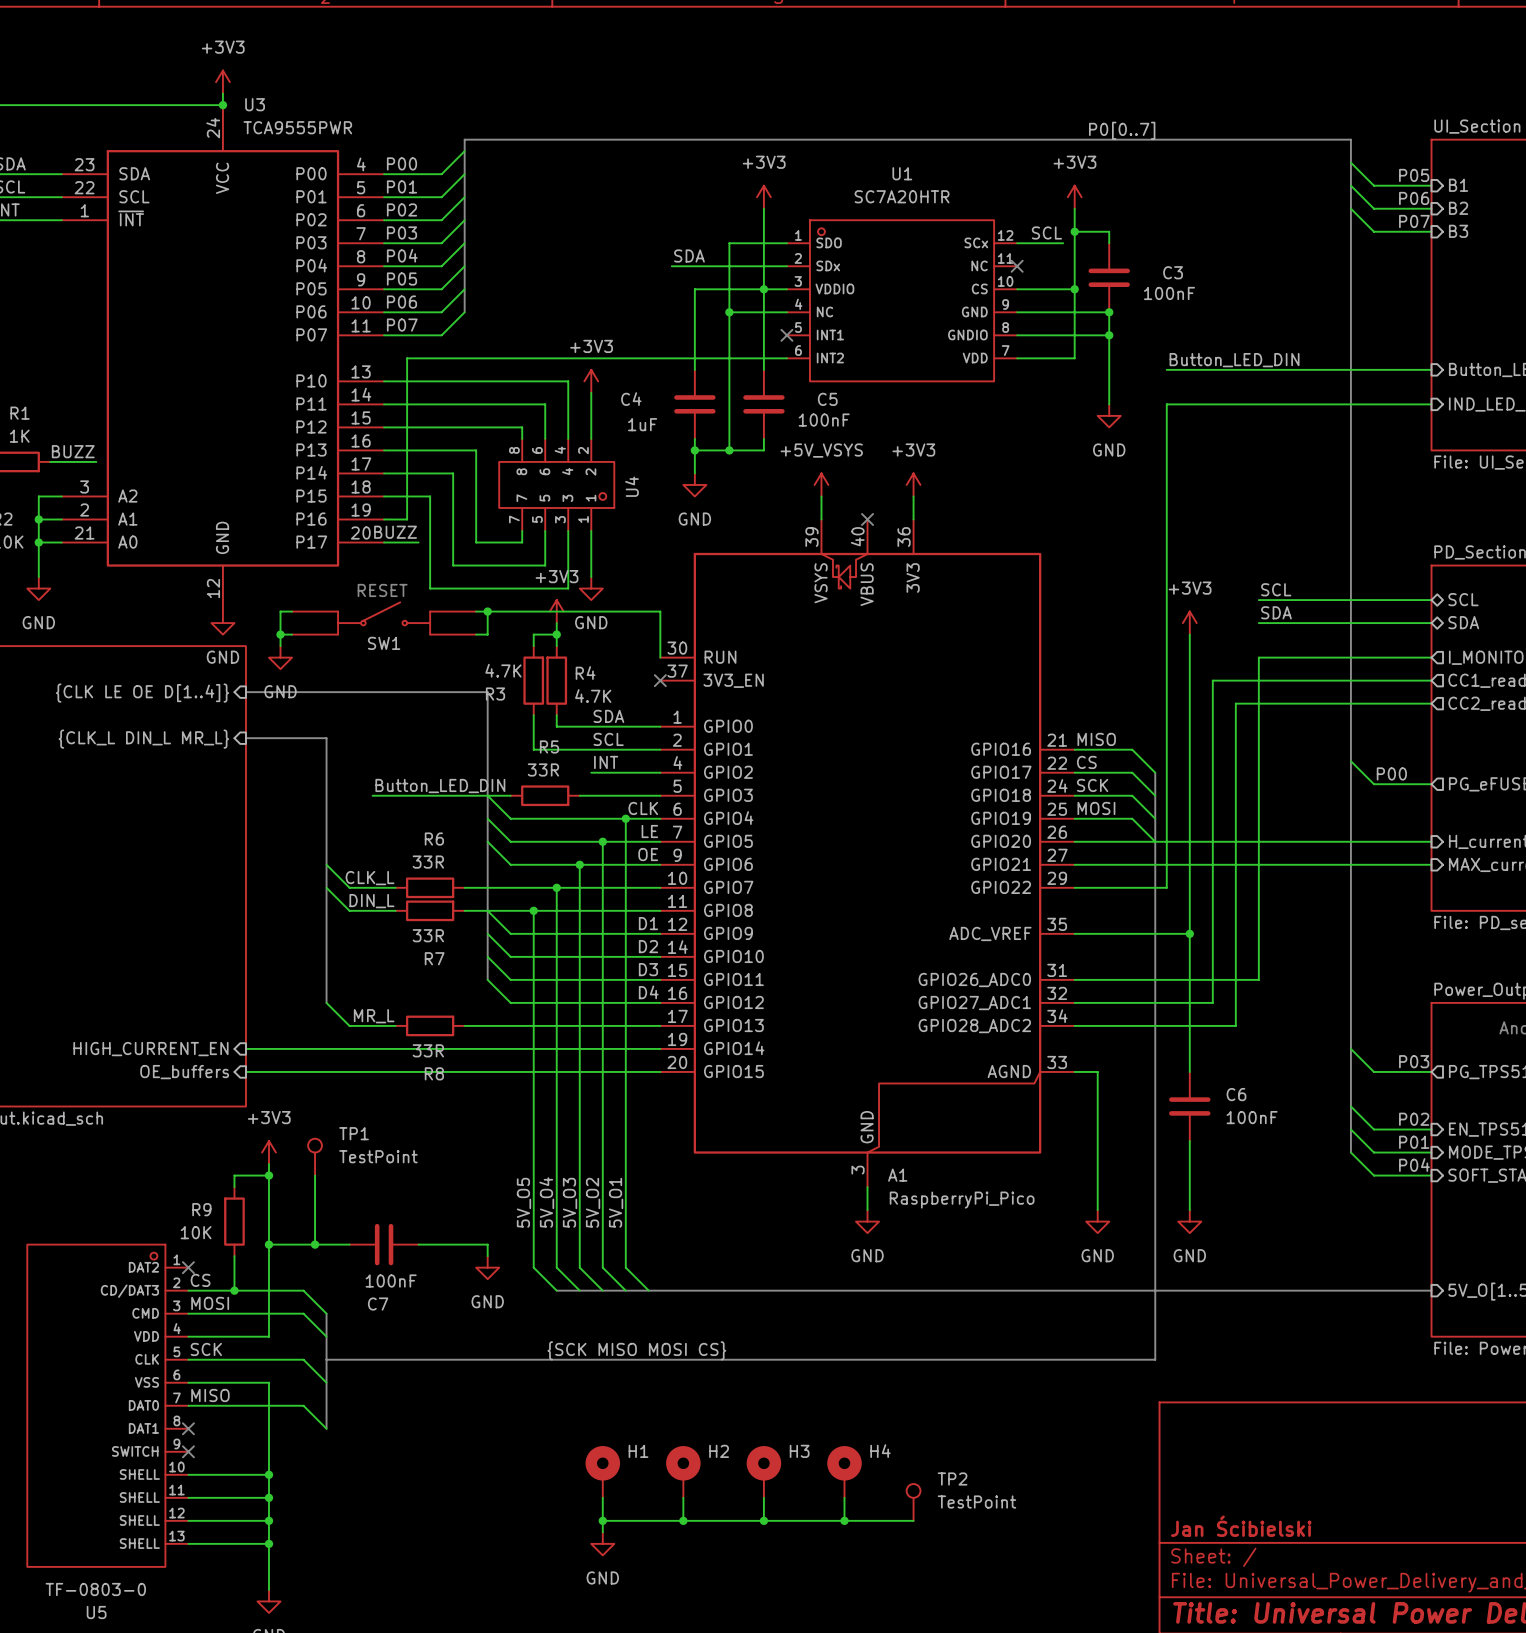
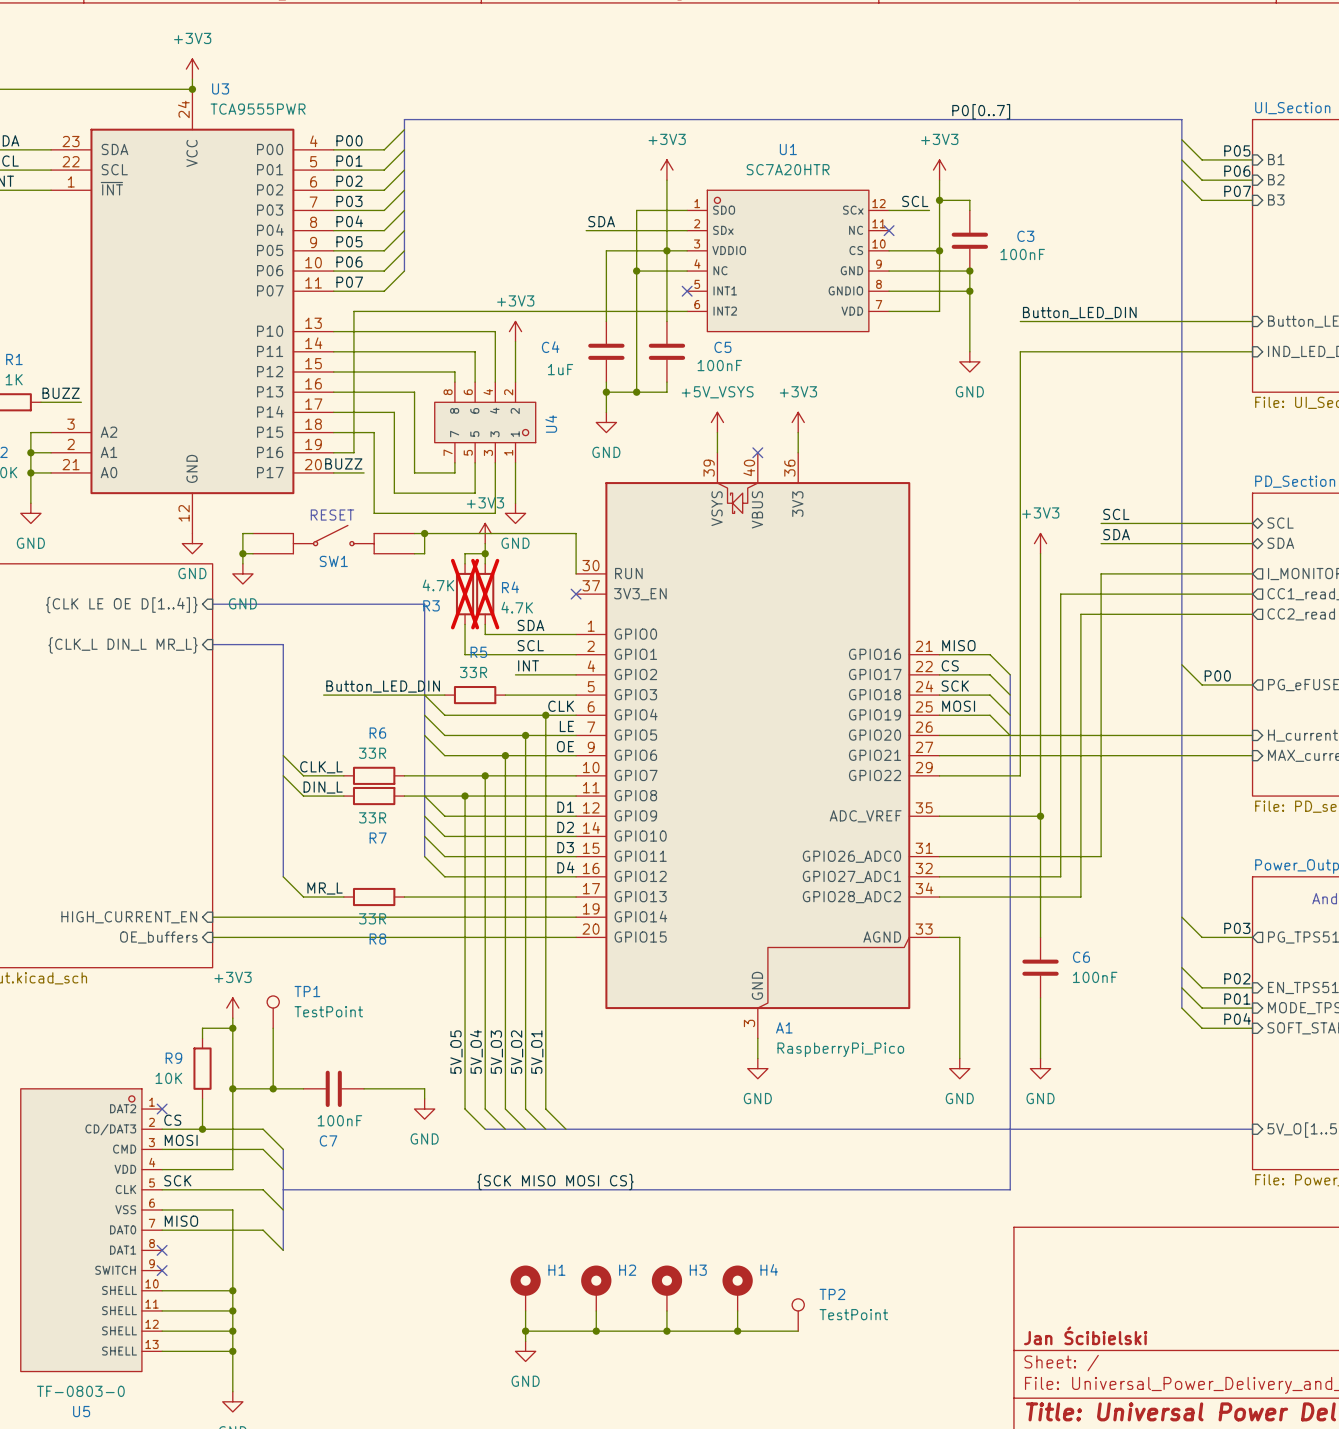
R3 do-not-place cross: none -> (465, 594)
R4 do-not-place cross: none -> (485, 594)

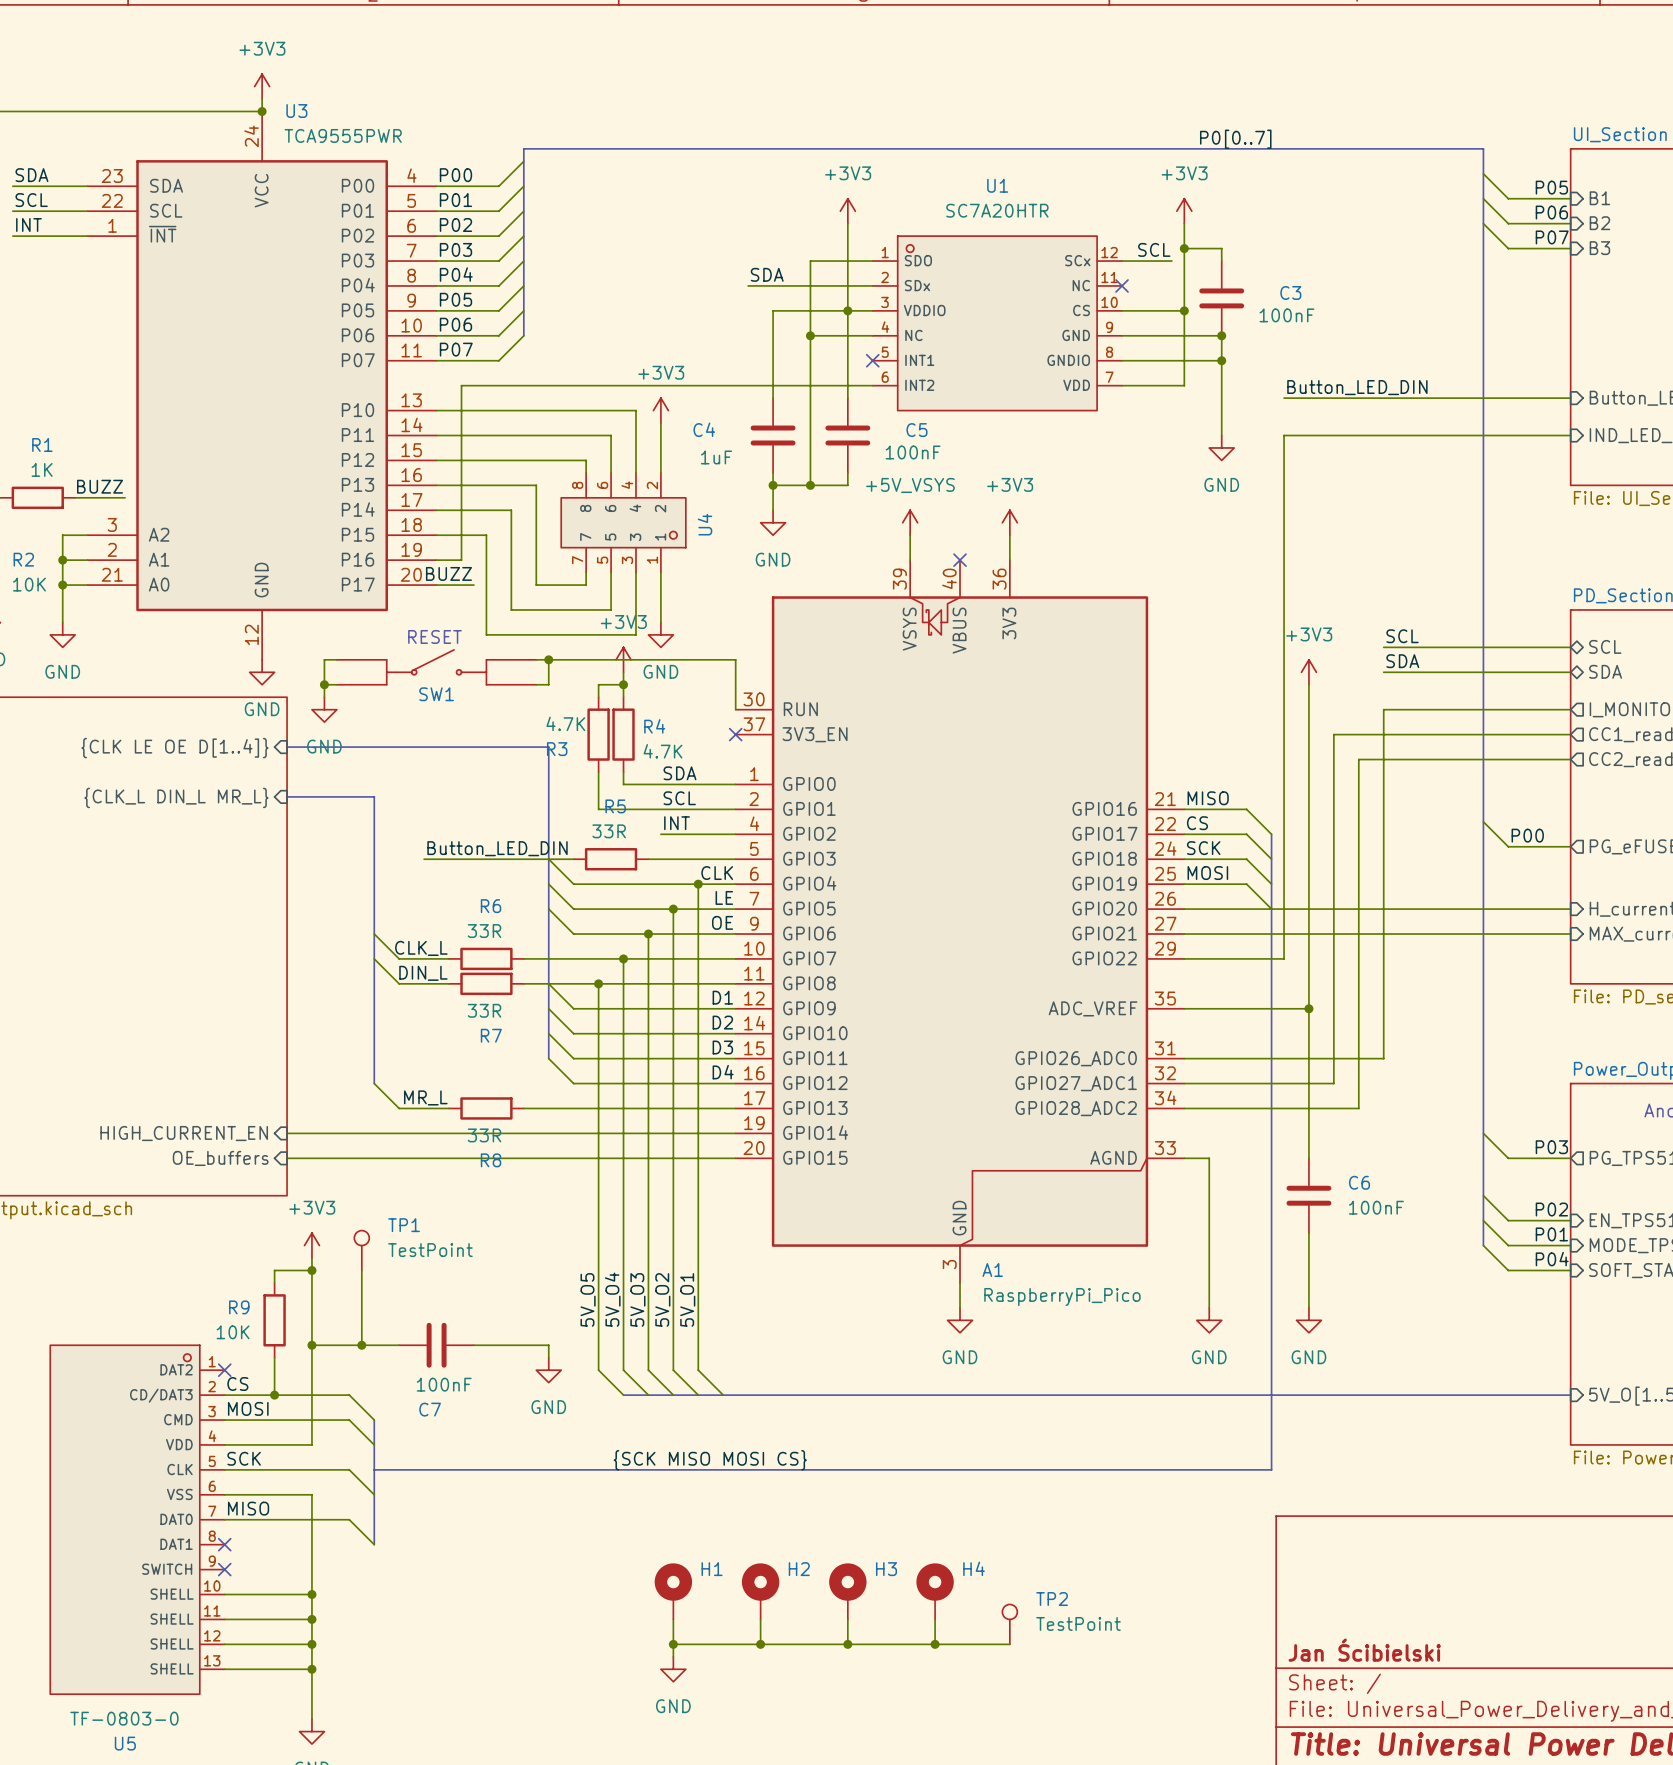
R3 do-not-place cross: (465, 594) -> none
R4 do-not-place cross: (485, 594) -> none

